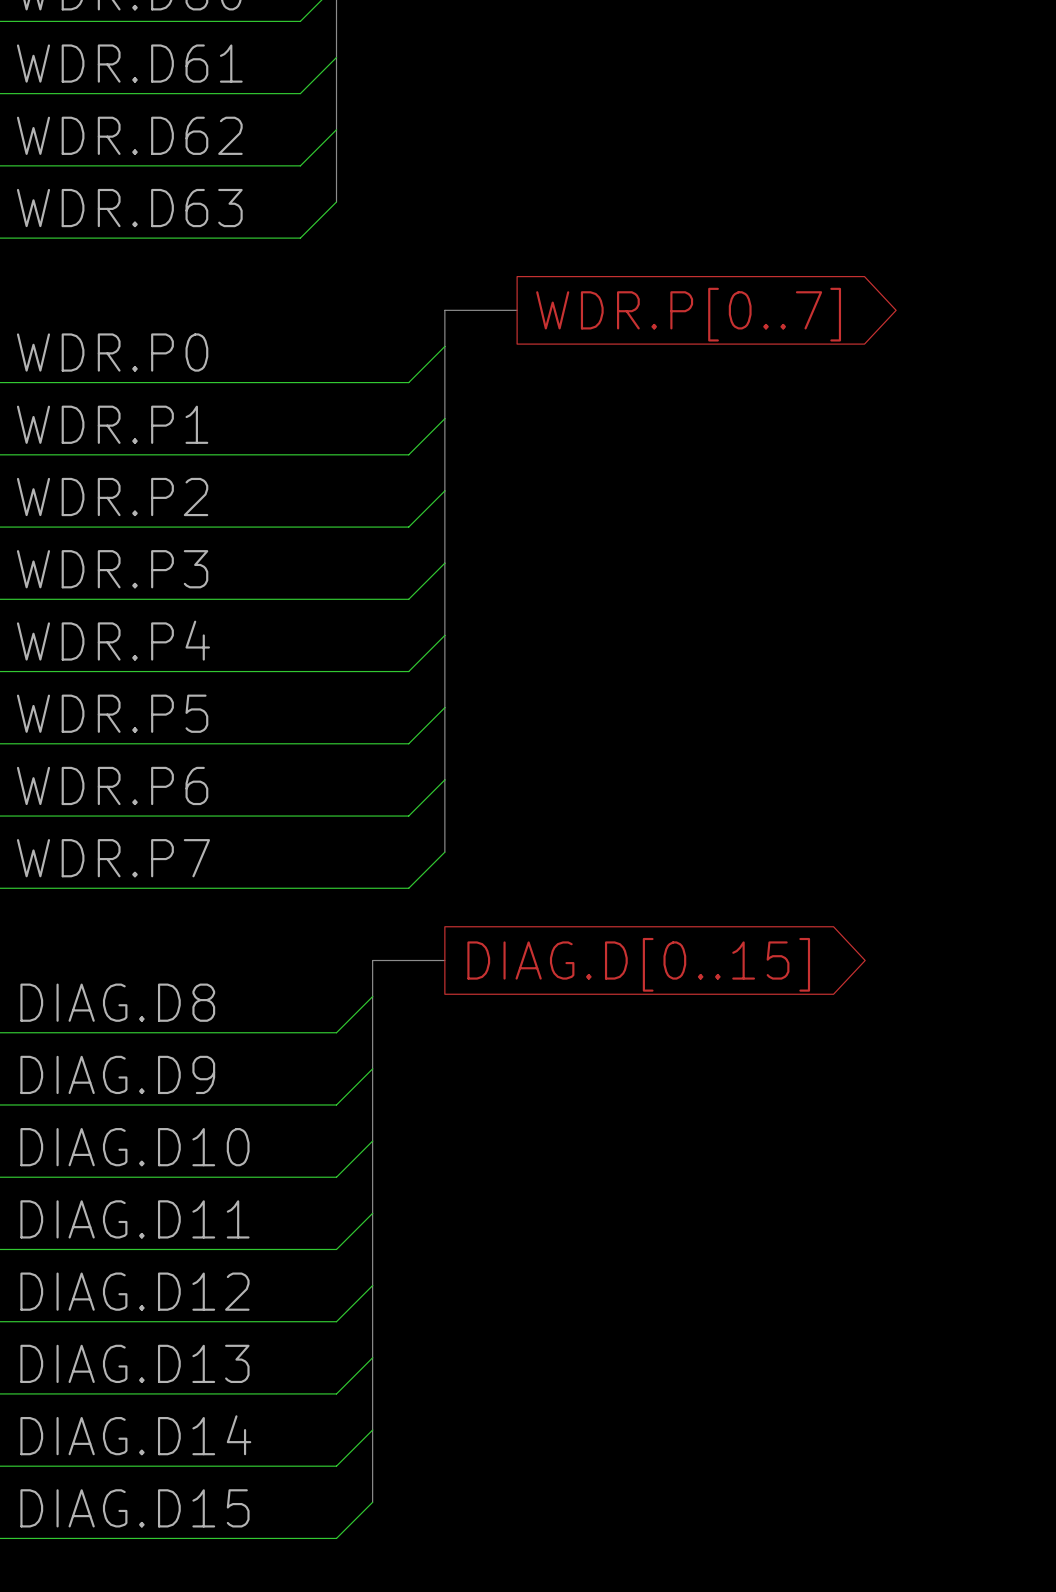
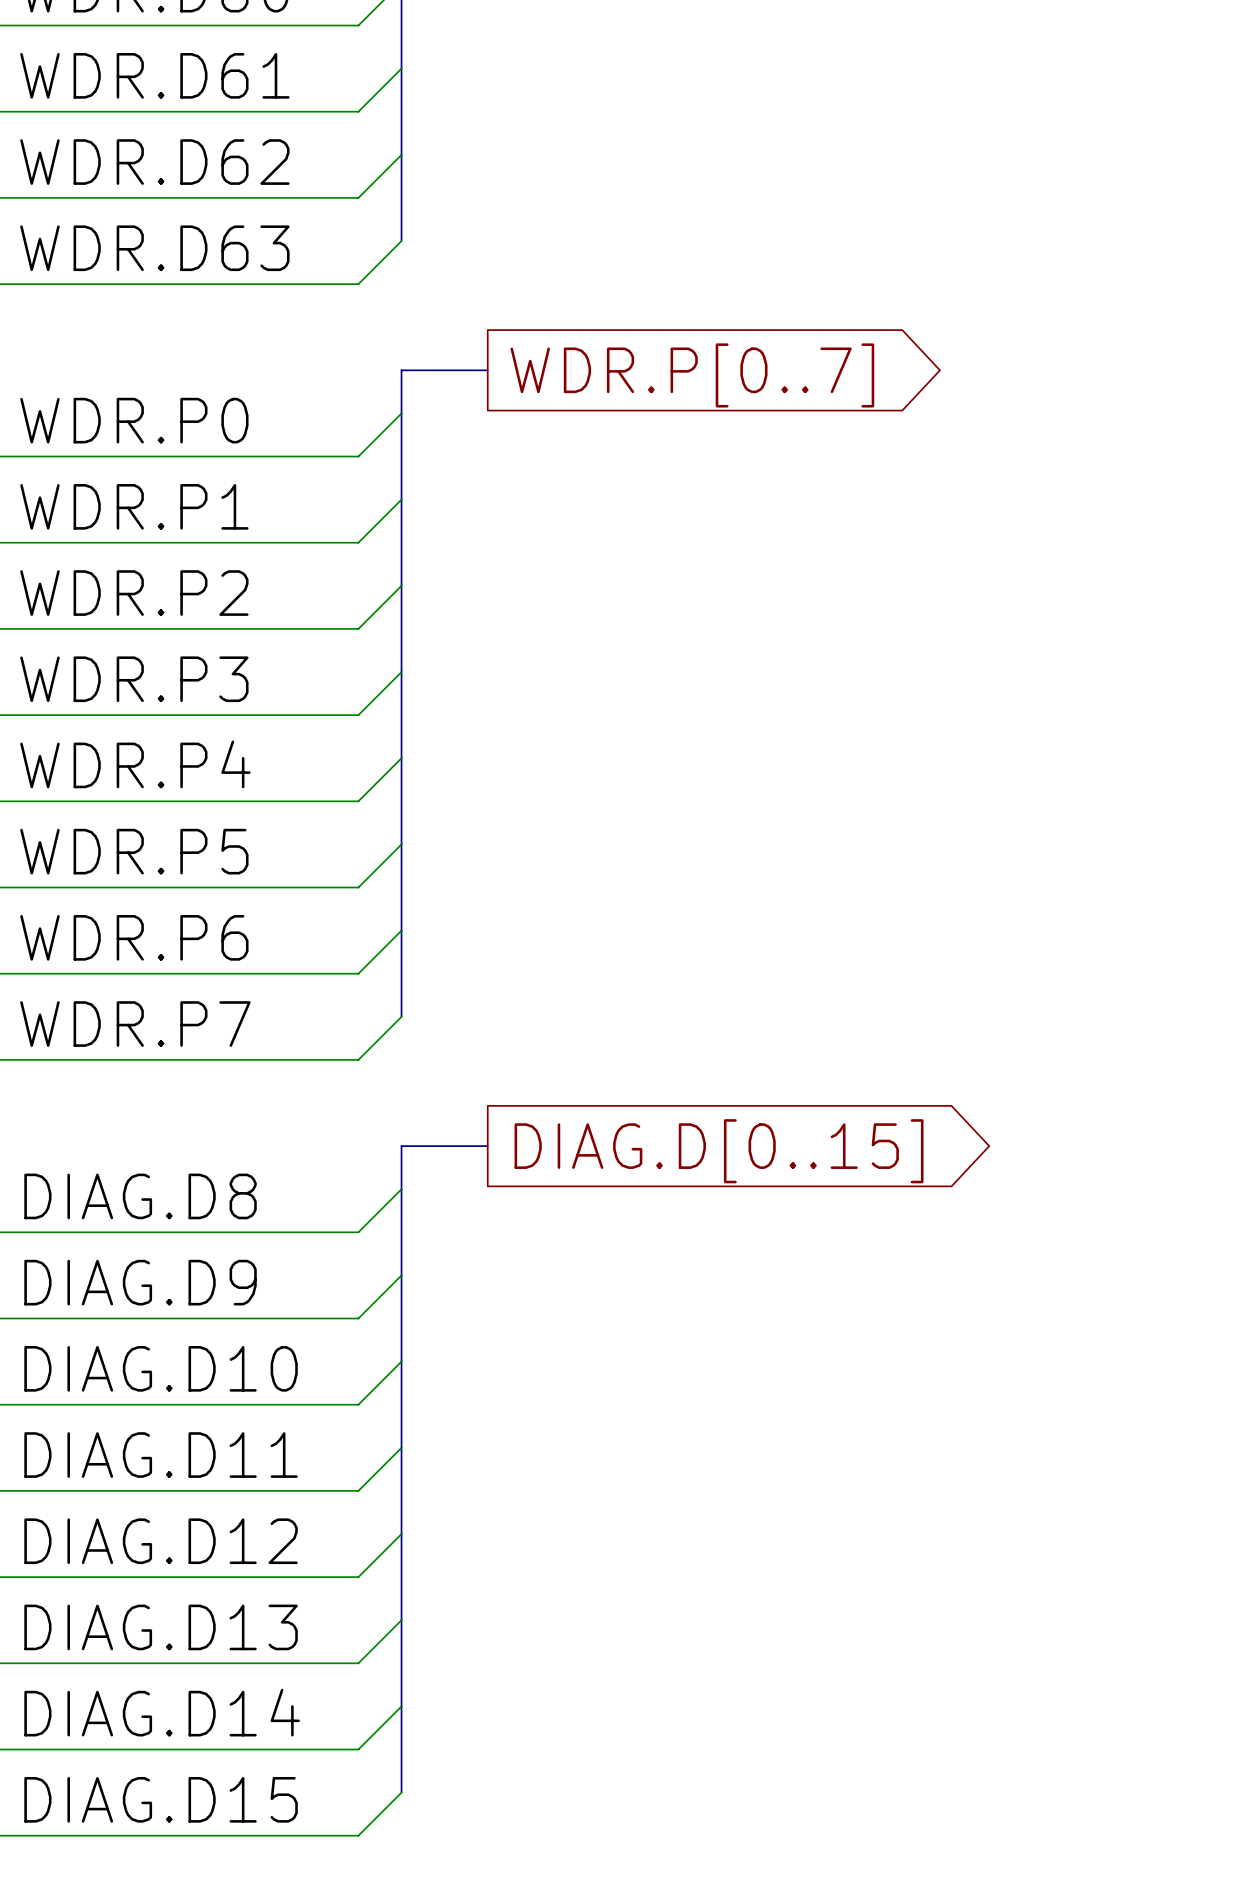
bus: (517, 310) (444, 310) (444, 852) -> (487, 370) (401, 370) (401, 1016)
global label position: WDR.P[0..7] (688, 314) -> WDR.P[0..7] (692, 375)
wire: (444, 346) (408, 382) (300, 382) -> (401, 413) (358, 456)
wire: (444, 418) (408, 454) (300, 454) -> (401, 499) (358, 542)
wire: (444, 490) (408, 527) (300, 527) -> (401, 585) (358, 628)
wire: (444, 563) (408, 599) (300, 599) -> (401, 672) (358, 715)
wire: (444, 635) (408, 671) (300, 671) -> (401, 758) (358, 801)
wire: (444, 707) (408, 743) (300, 743) -> (401, 844) (358, 887)
wire: (444, 779) (408, 816) (300, 816) -> (401, 930) (358, 973)
wire: (444, 852) (408, 888) (300, 888) -> (401, 1016) (358, 1059)
bus: (372, 960) (372, 1502) -> (444, 1146) (401, 1146) (401, 1792)
bus: (408, 960) (444, 960) -> none
global label position: DIAG.D[0..15] (638, 964) -> DIAG.D[0..15] (719, 1151)
wire: (372, 996) (336, 1032) (300, 1032) -> (401, 1189) (358, 1232)
wire: (372, 1068) (336, 1104) (300, 1104) -> (401, 1275) (358, 1318)
wire: (372, 1141) (336, 1177) (300, 1177) -> (401, 1361) (358, 1404)
wire: (372, 1213) (336, 1249) (300, 1249) -> (401, 1447) (358, 1490)
wire: (372, 1285) (336, 1321) (300, 1321) -> (401, 1534) (358, 1577)
wire: (372, 1357) (336, 1393) (300, 1393) -> (401, 1620) (358, 1663)
wire: (372, 1430) (336, 1466) (300, 1466) -> (401, 1706) (358, 1749)
wire: (372, 1502) (336, 1538) (300, 1538) -> (401, 1792) (358, 1835)

